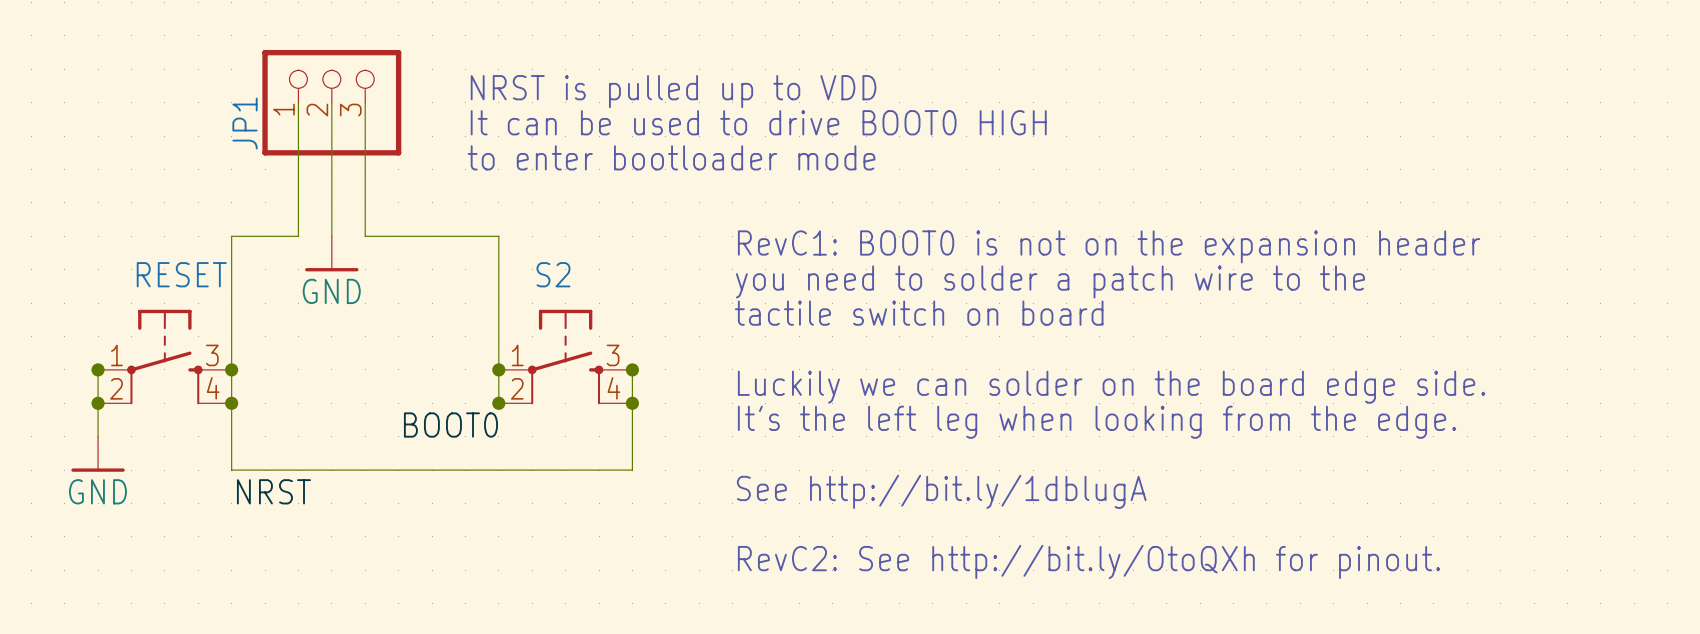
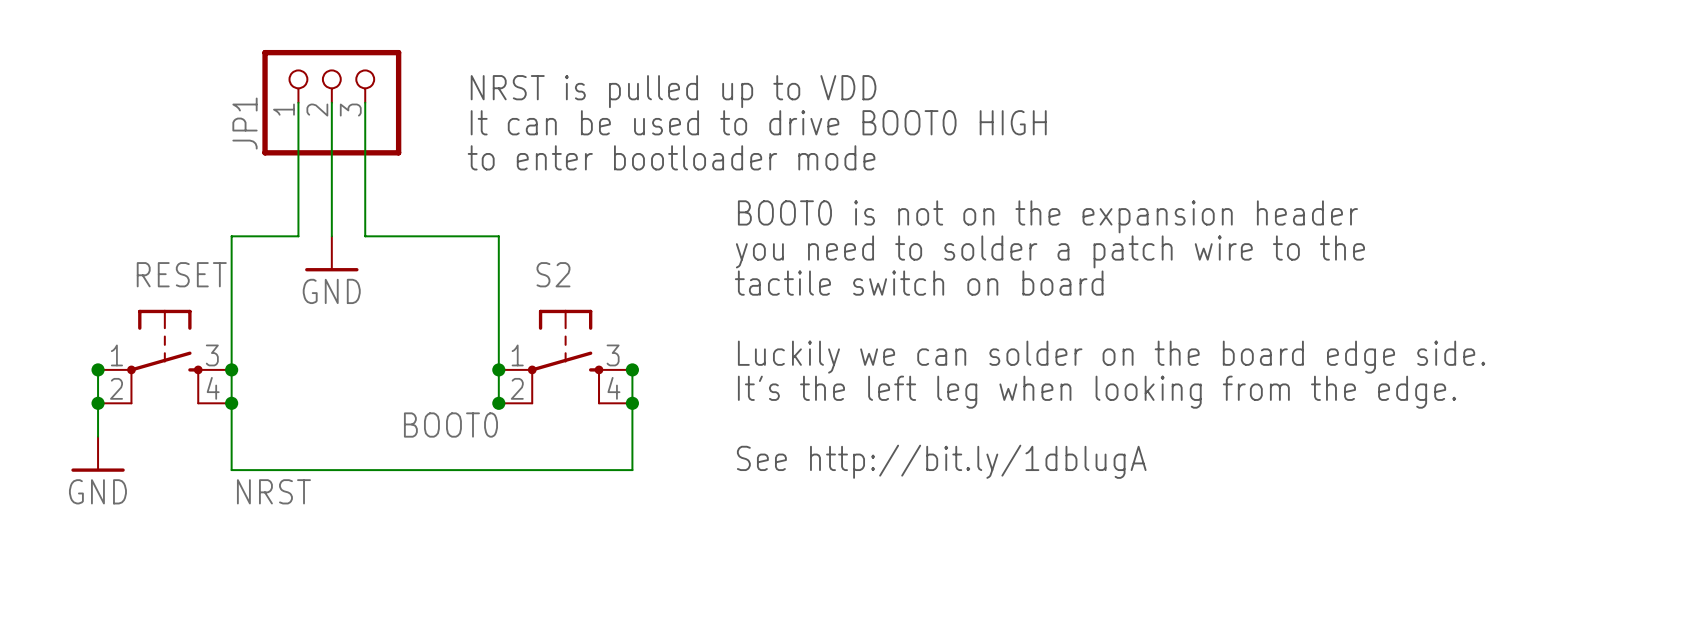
text: none -> BOOT0 is not on the expansion header (1047, 216)
text: RevC1: BOOT0 is not on the expansion header (1109, 246) -> you need to solder a patch wire to the (1050, 251)
text: you need to solder a patch wire to the (1050, 281) -> tactile switch on board (919, 283)
text: tactile switch on board (919, 313) -> none
text: none -> Luckily we can solder on the board edge side. (1111, 357)
text: Luckily we can solder on the board edge side. (1111, 387) -> It's the left leg when looking from the edge. (1097, 392)
text: It's the left leg when looking from the edge. (1097, 422) -> none
text position: See http://bit.ly/1dblugA (941, 491) -> See http://bit.ly/1dblugA (941, 461)
text: RevC2: See http://bit.ly/OtoQXh for pinout. (1089, 561) -> none

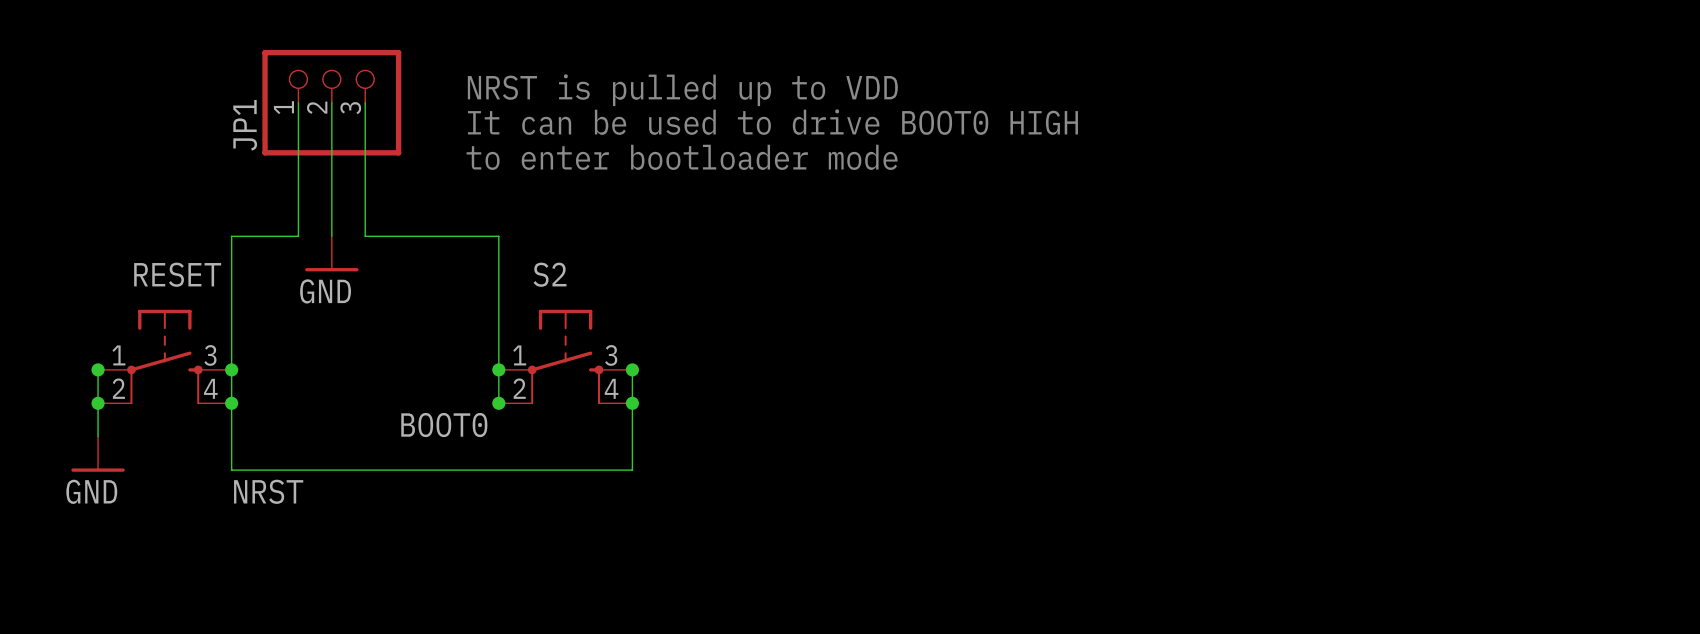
text: BOOT0 is not on the expansion header (1047, 216) -> none
text: you need to solder a patch wire to the (1050, 251) -> none
text: tactile switch on board (919, 283) -> none
text: Luckily we can solder on the board edge side. (1111, 357) -> none
text: It's the left leg when looking from the edge. (1097, 392) -> none
text: See http://bit.ly/1dblugA (941, 461) -> none

